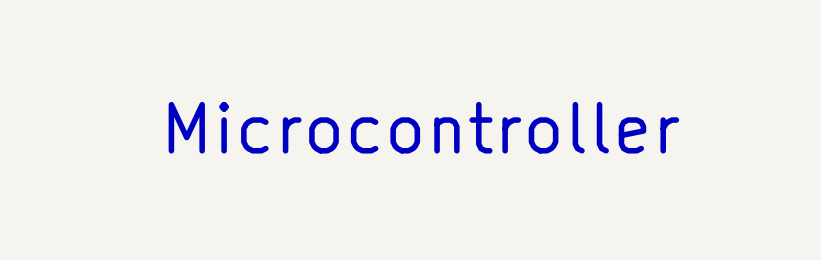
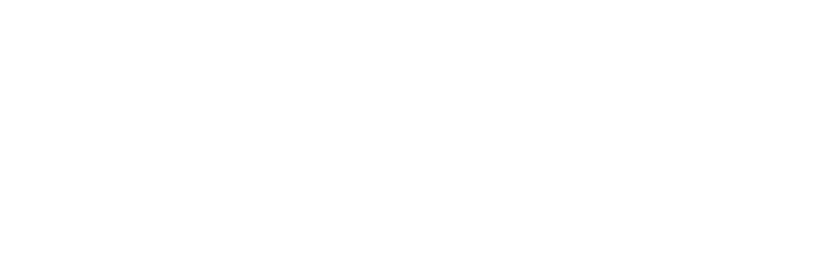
text: Microcontroller (423, 127) -> none

